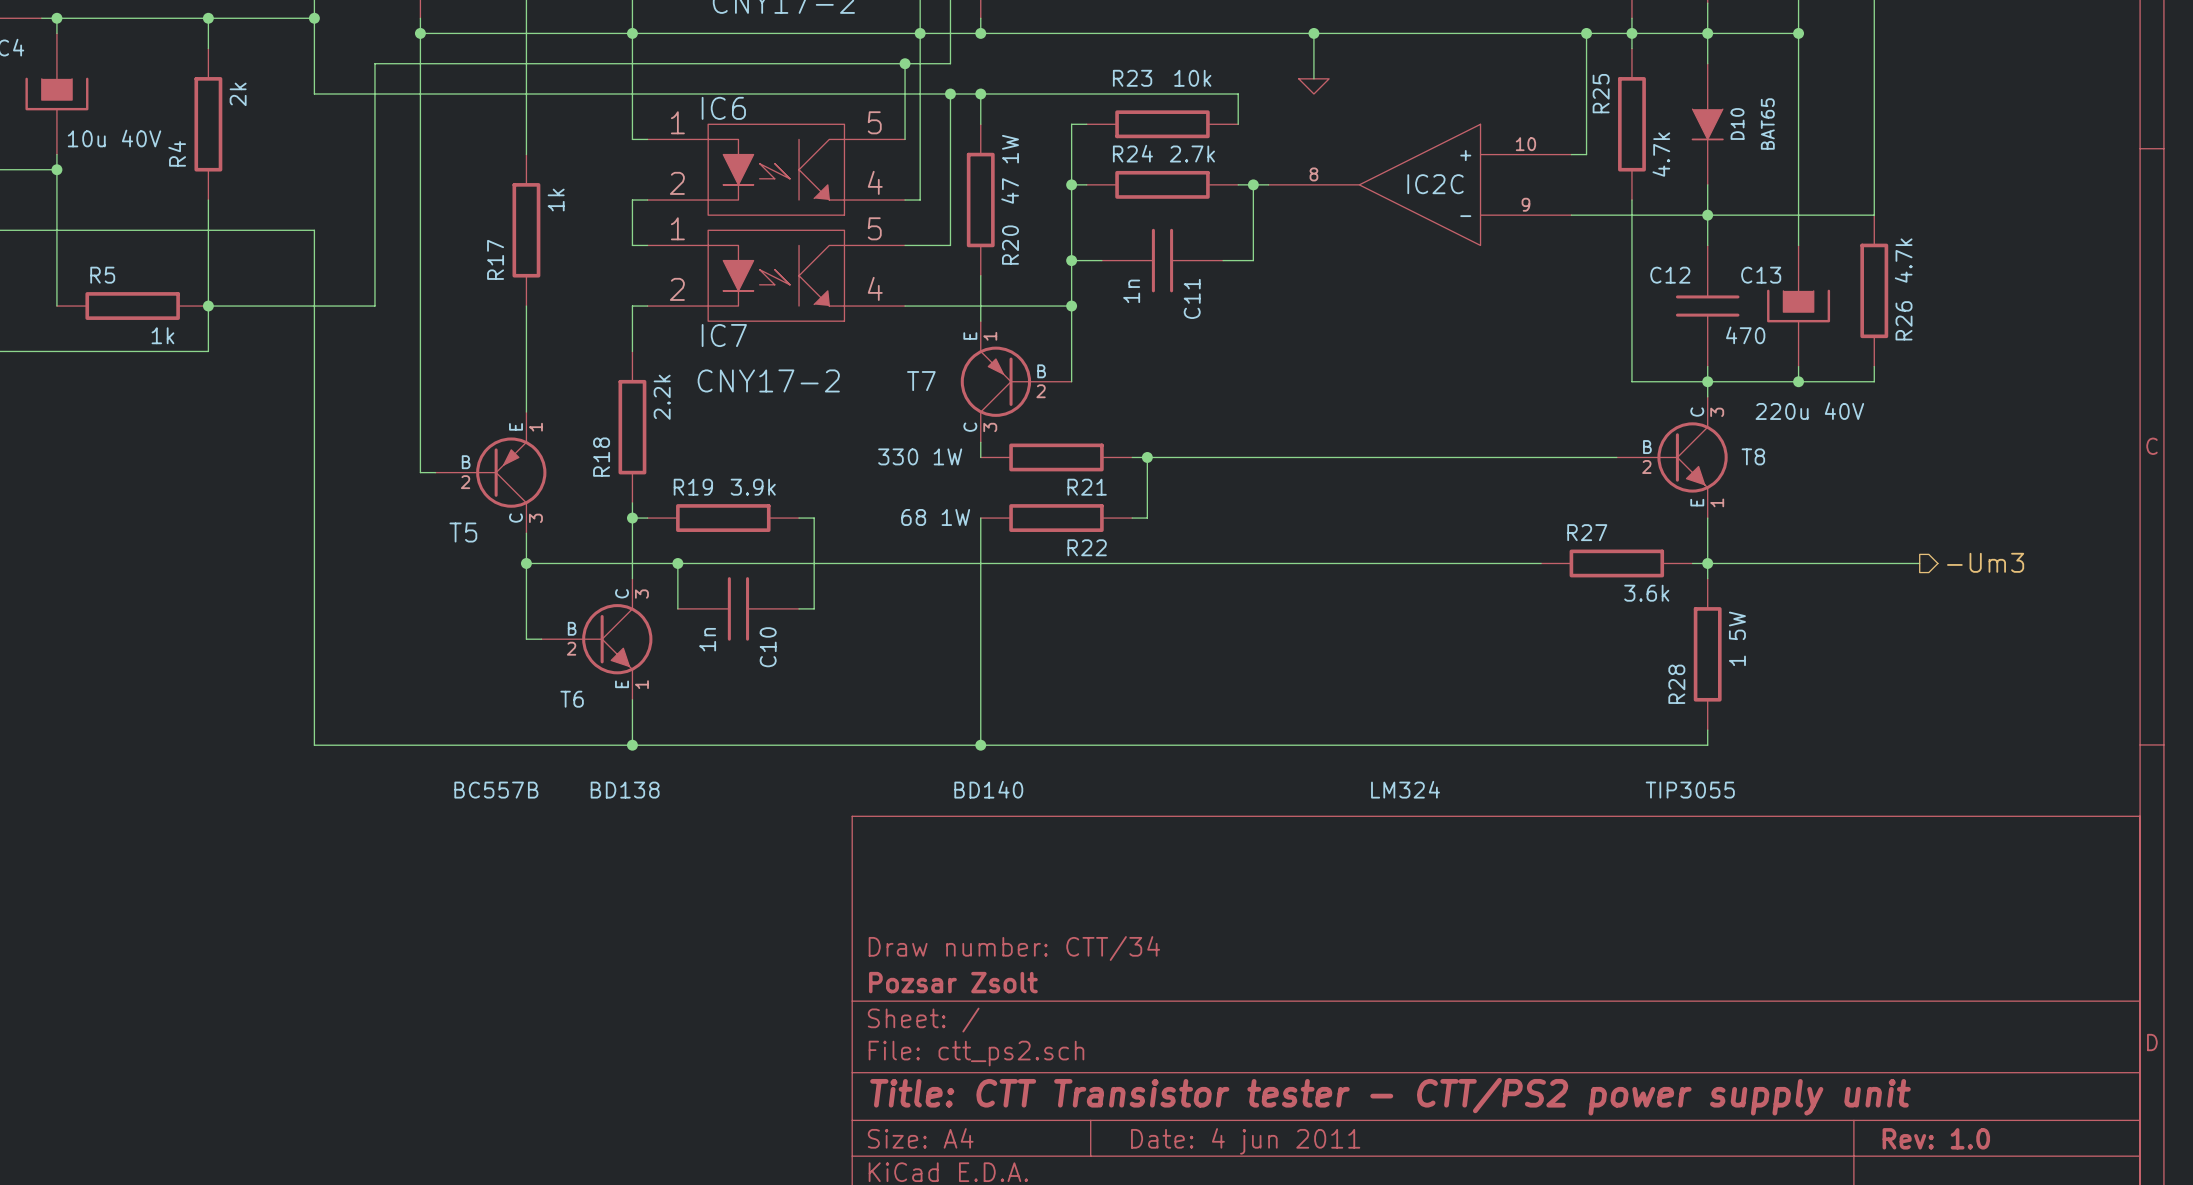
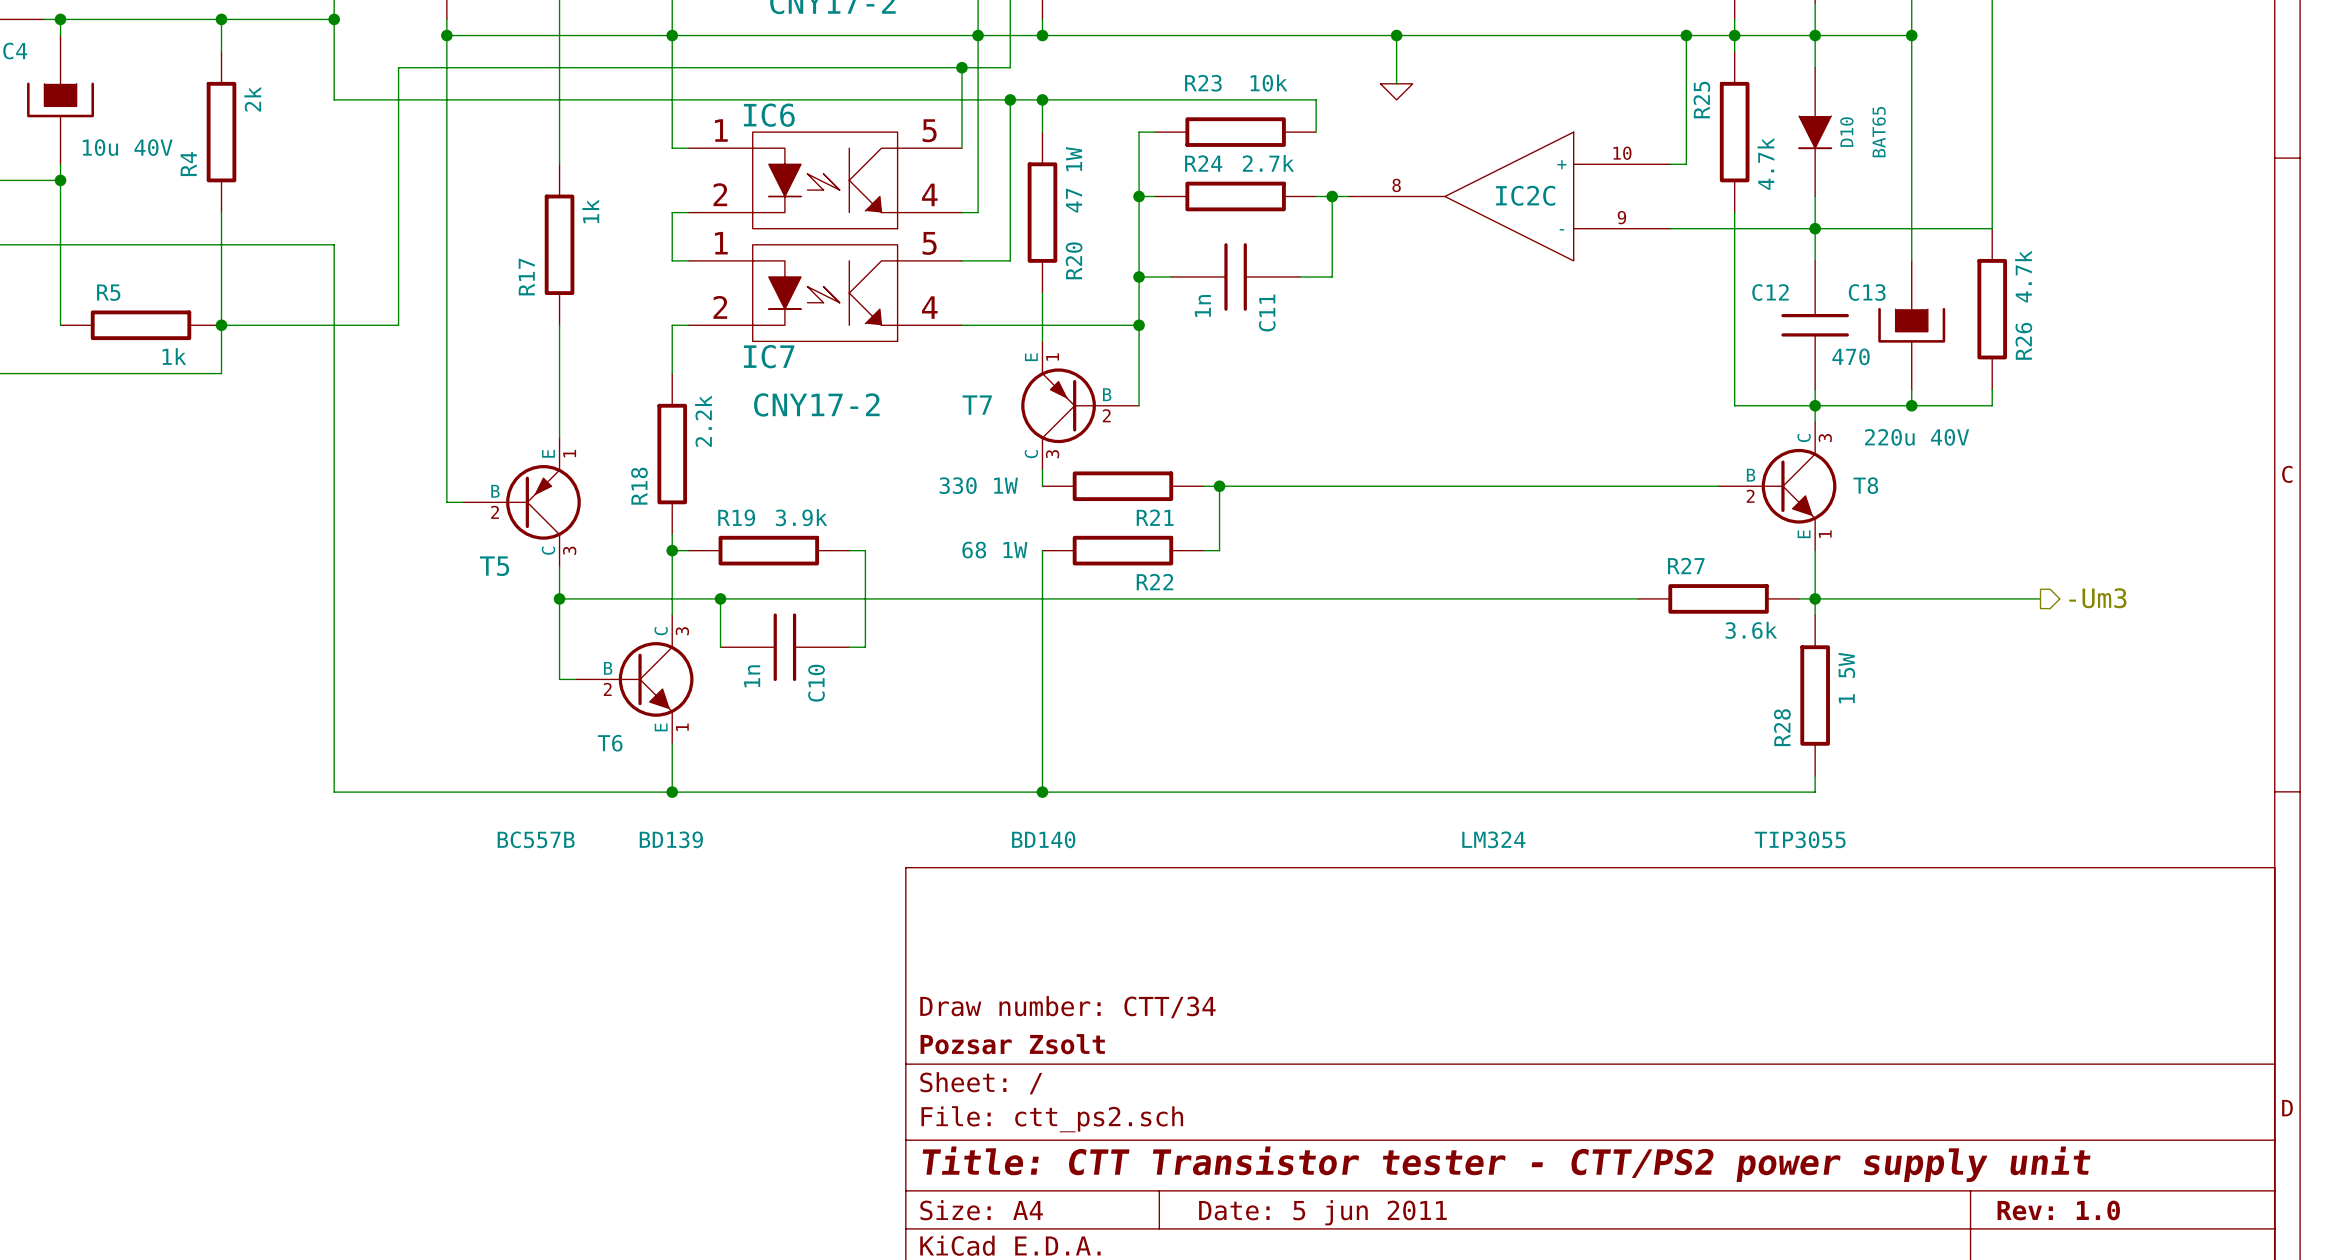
T6 value: BD138 (625, 790) -> BD139 (671, 839)
title block: Date: 4 jun 2011 (1245, 1141) -> Date: 5 jun 2011 (1322, 1212)

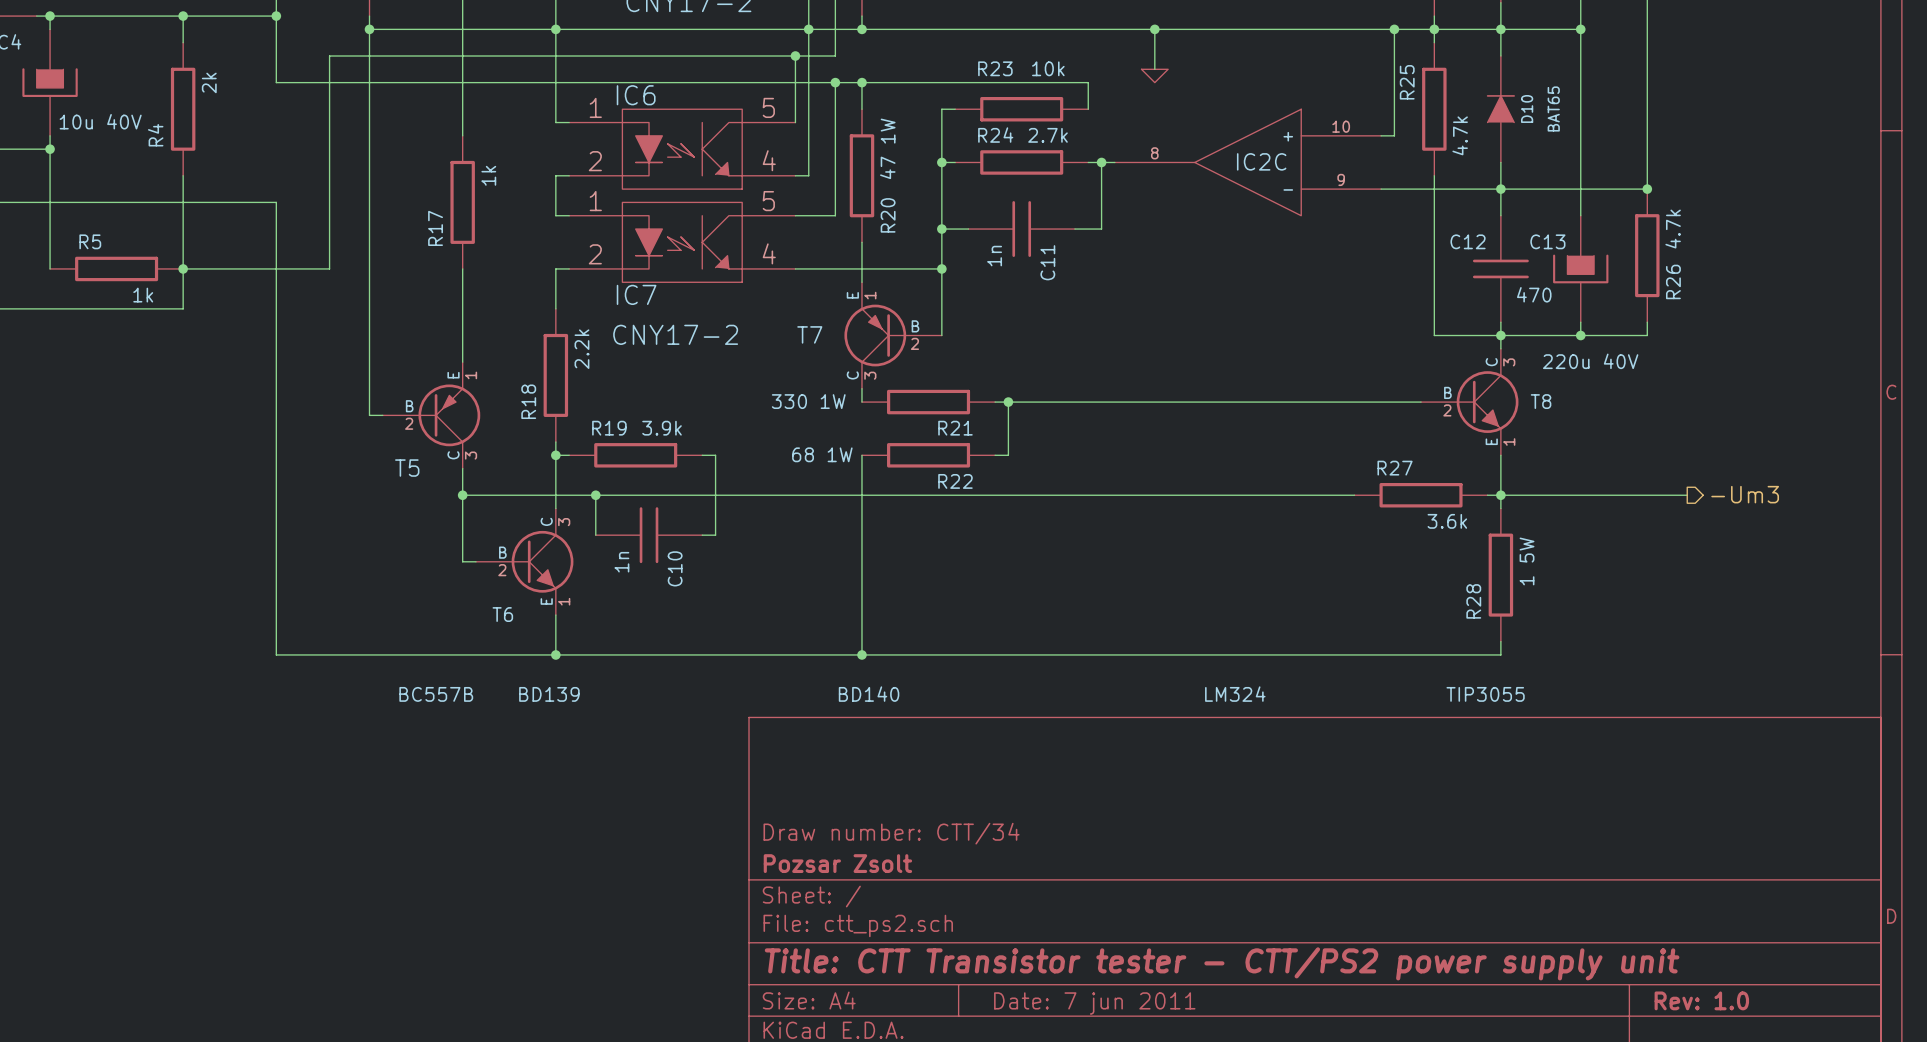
D10 rotation: 0° (1815, 132) -> 180° (1500, 108)
junction: none -> (1647, 189)
title block: Date: 5 jun 2011 (1322, 1212) -> Date: 7 jun 2011 (1094, 1003)

